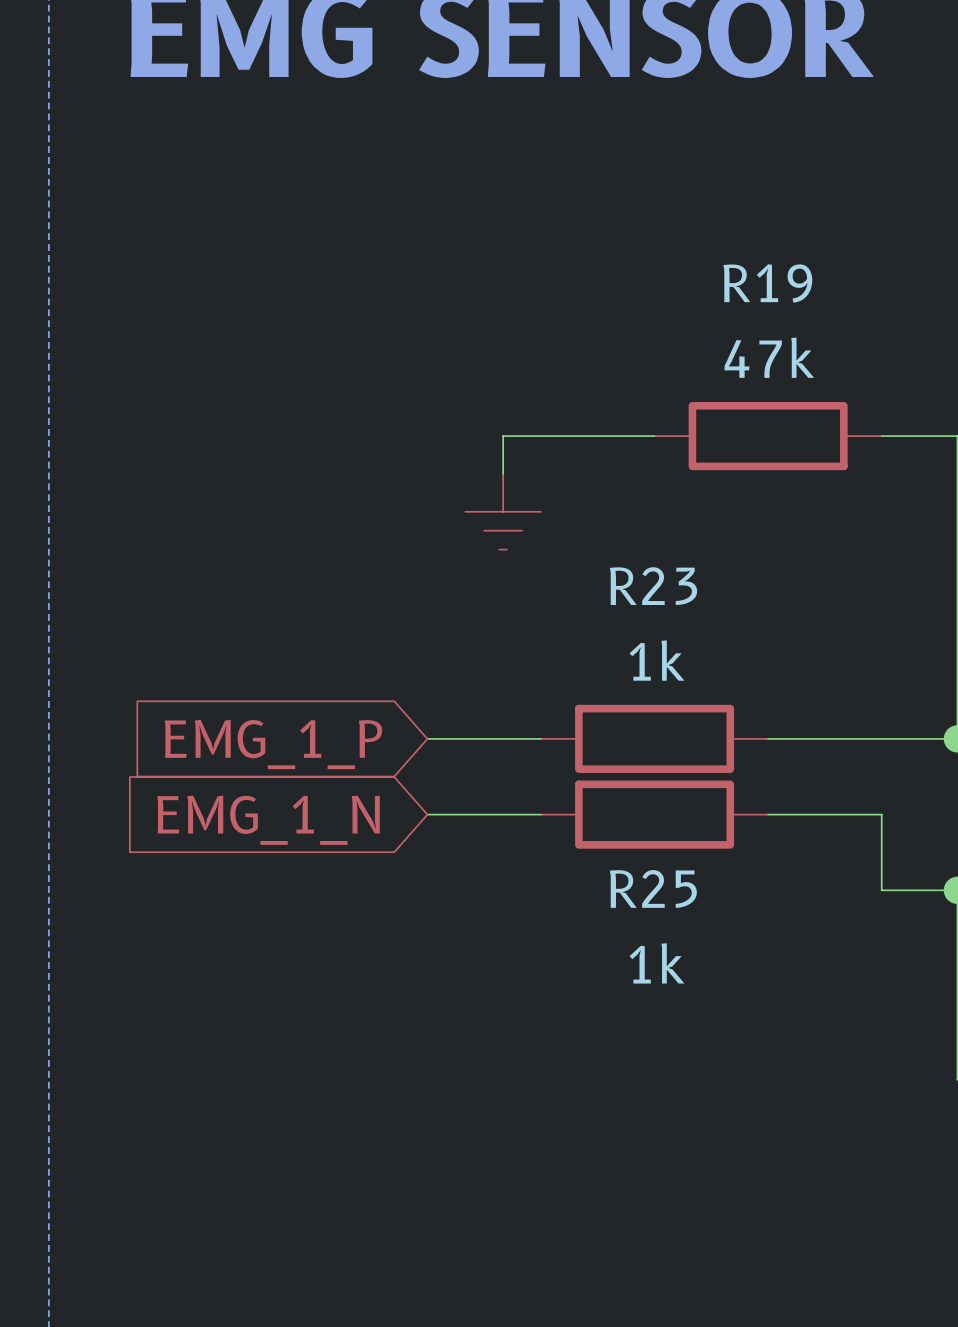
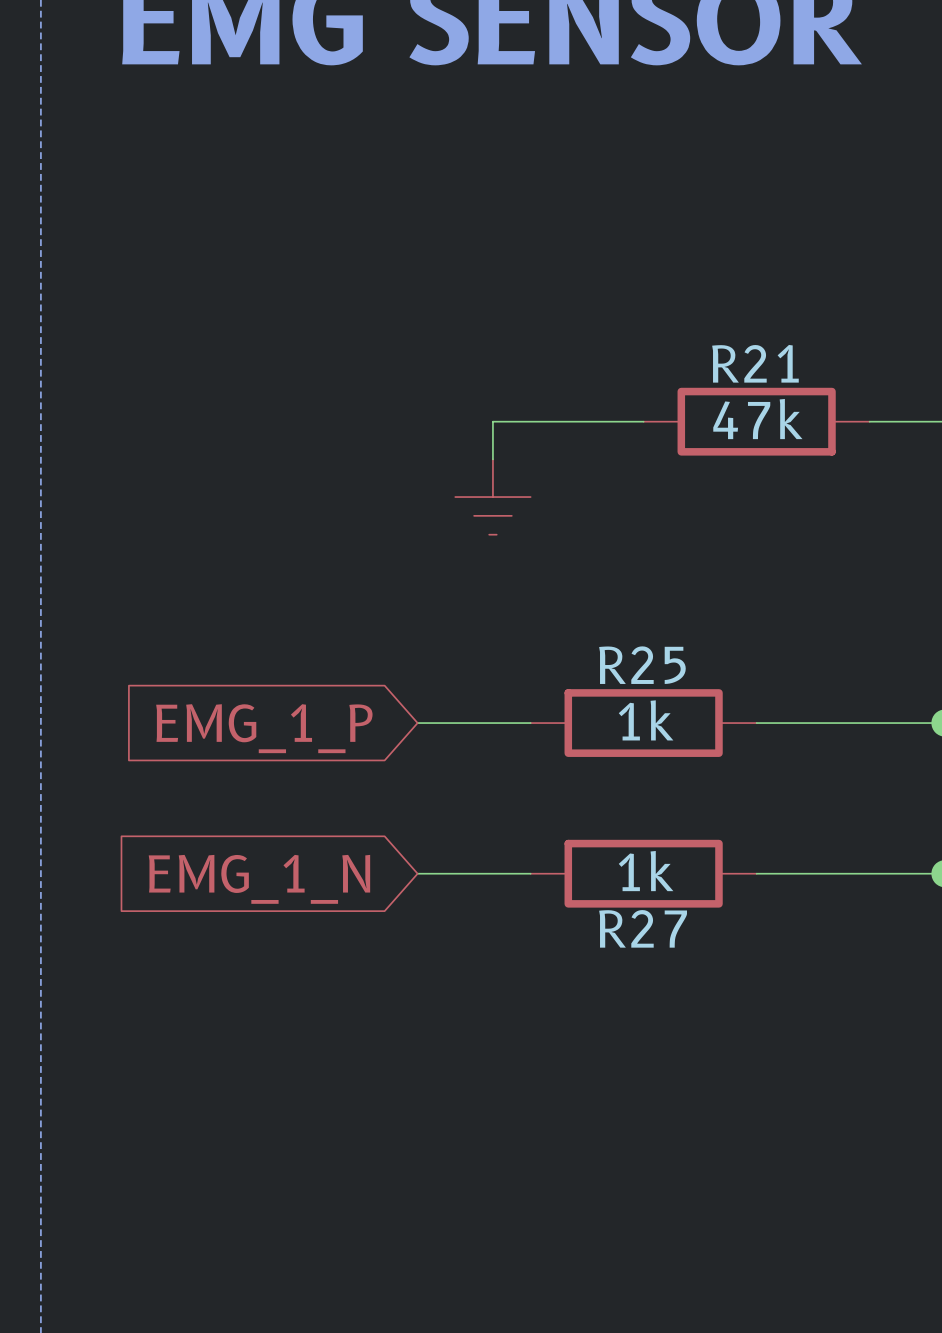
R19 name: R19 (767, 283) -> R21 (755, 363)
R19 value position: 47k (769, 357) -> 47k (757, 419)
R23 name: R23 (653, 586) -> R25 (642, 665)
R23 value position: 1k (657, 660) -> 1k (646, 720)
wire: (427, 814) (541, 814) -> (417, 873) (530, 873)
R25: 1k (654, 814) -> none
wire: (768, 814) (881, 814) (881, 890) -> (756, 873) (869, 873)
global label position: EMG_1_N (268, 820) -> EMG_1_N (259, 879)
R27: none -> 1k (643, 873)

